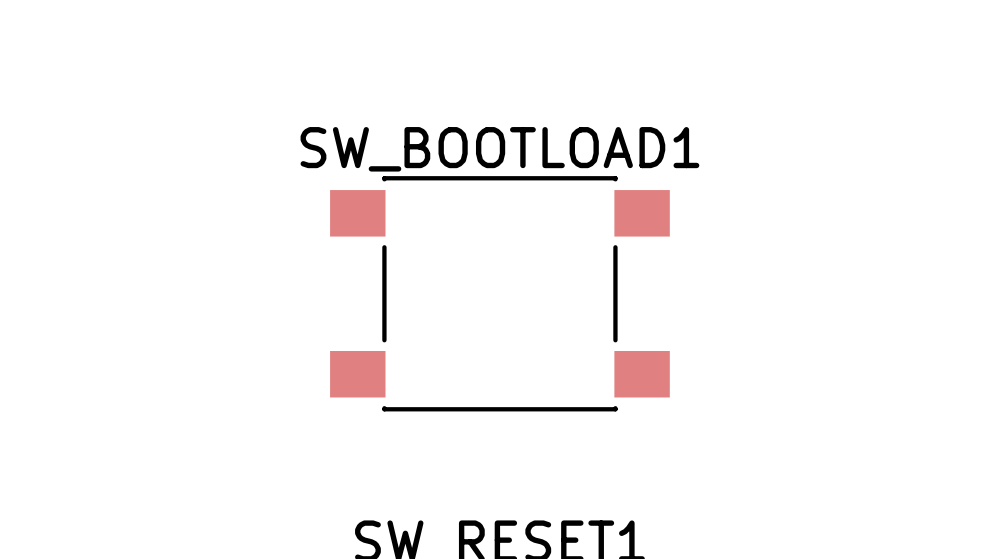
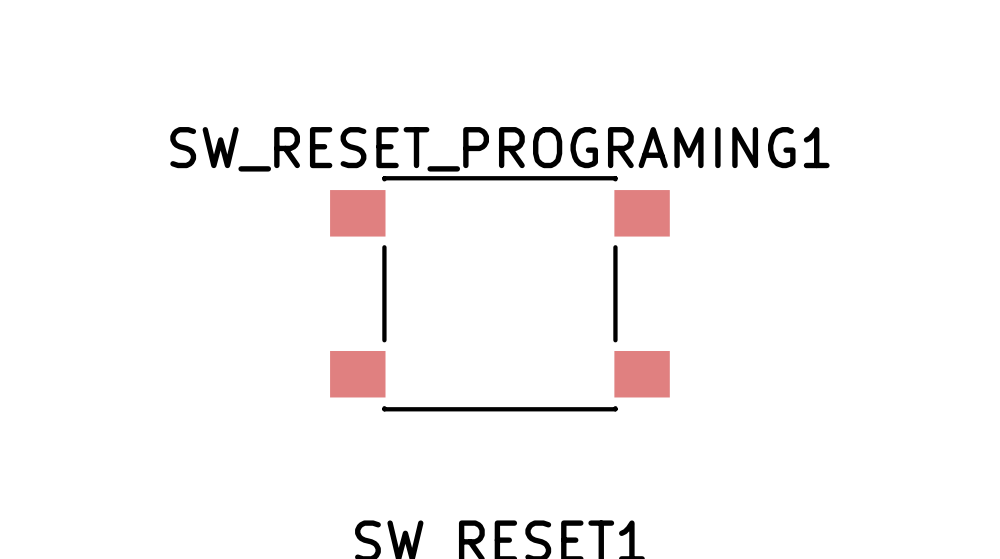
SW_BOOTLOAD1 name: SW_BOOTLOAD1 (499, 149) -> SW_RESET_PROGRAMING1 (499, 149)

